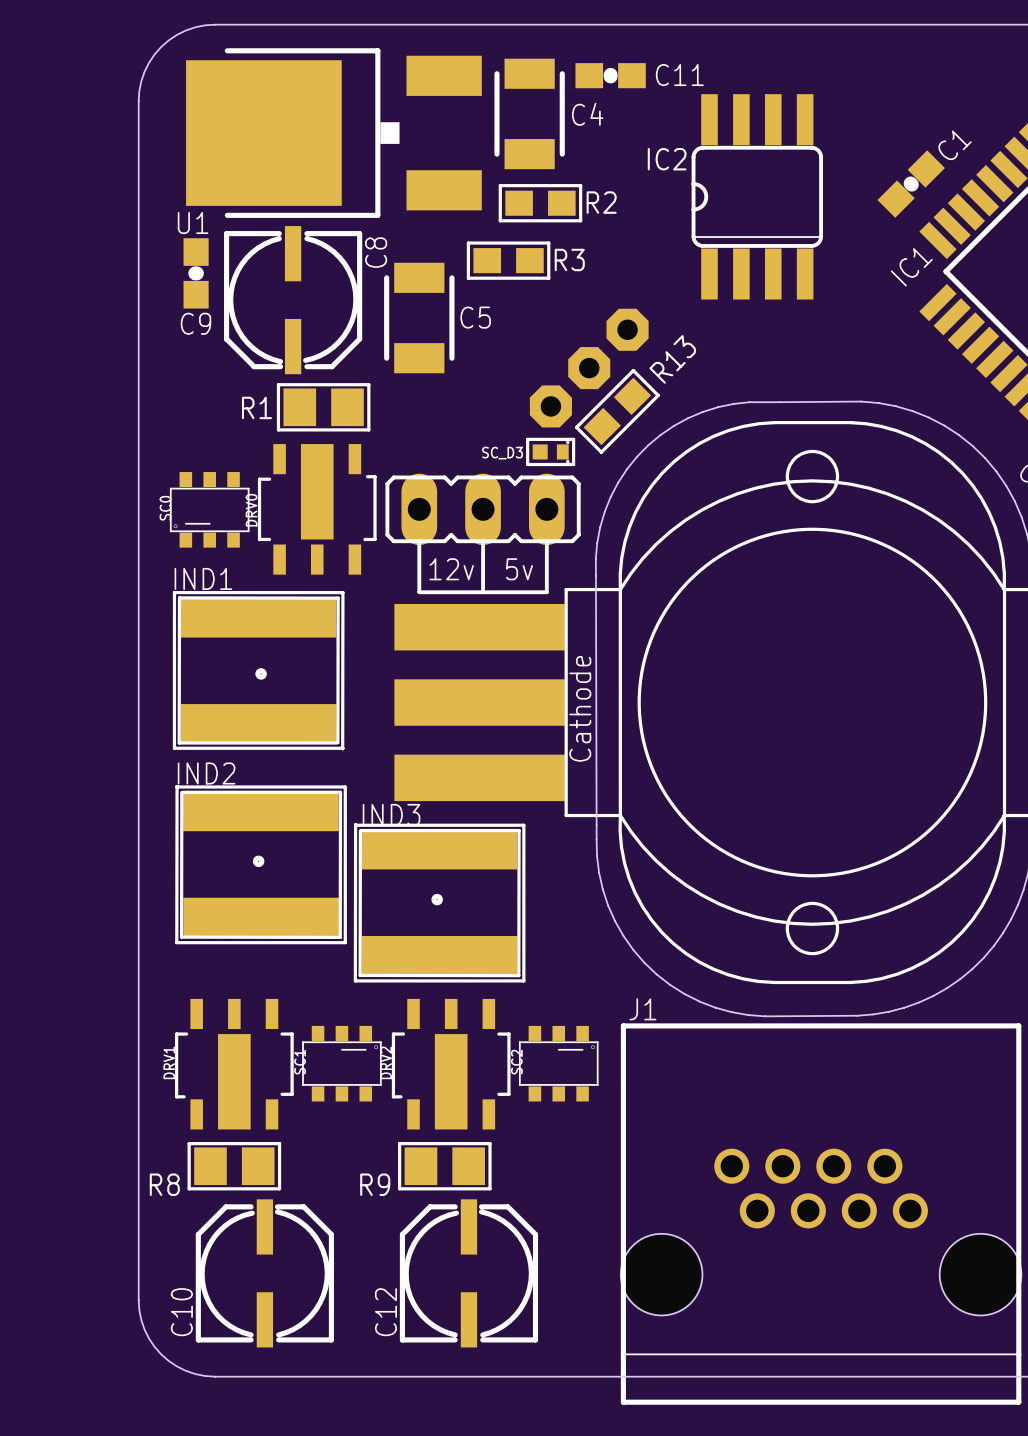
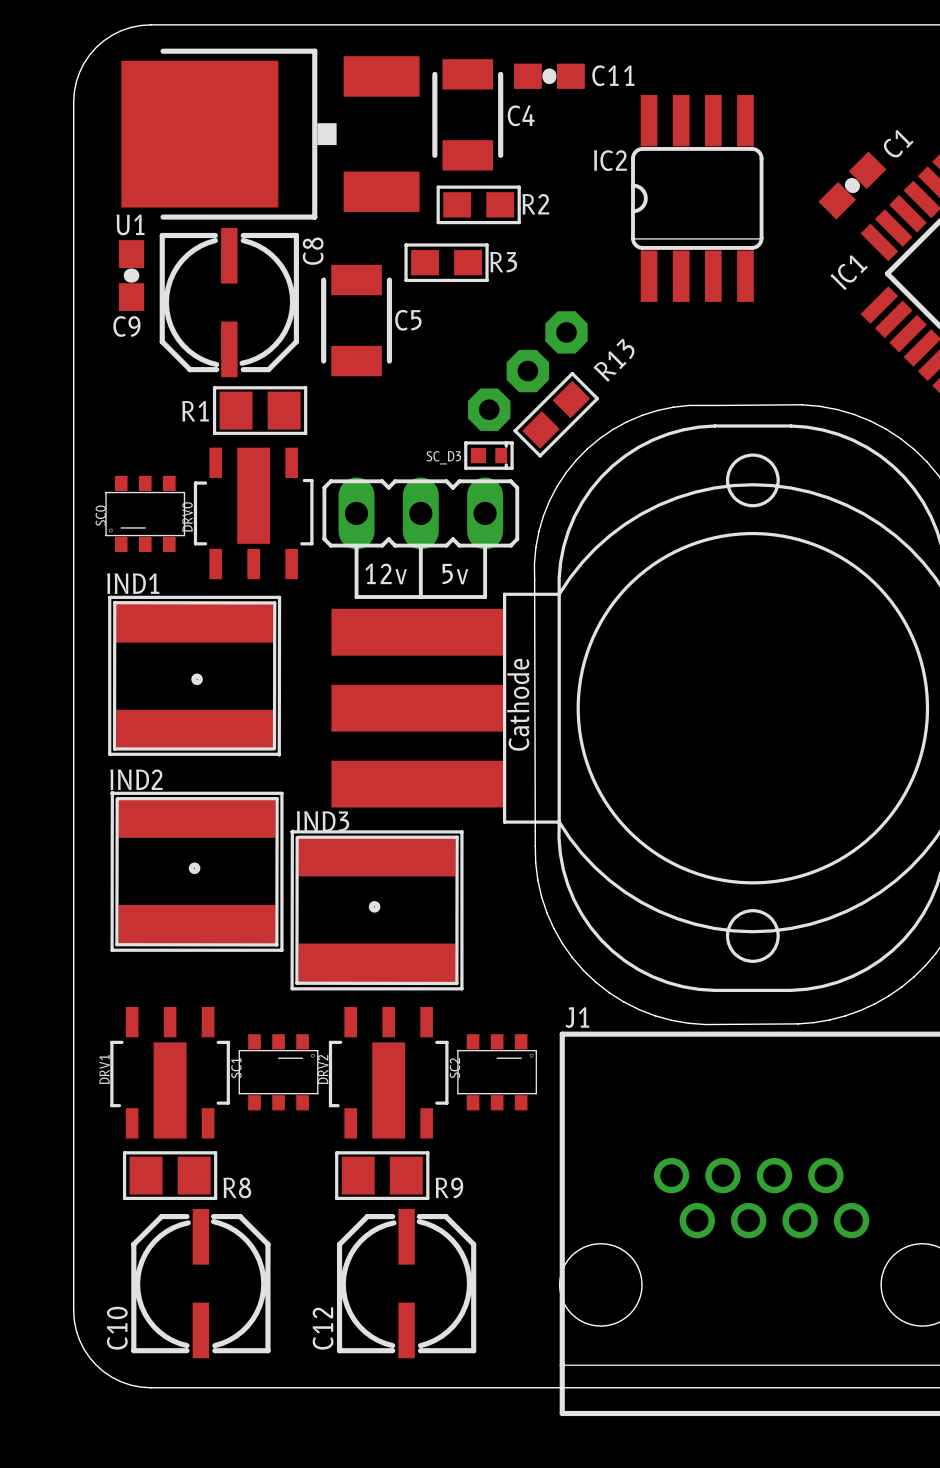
R8 name position: R8 (164, 1184) -> R8 (237, 1187)
R9 name position: R9 (375, 1184) -> R9 (449, 1187)

